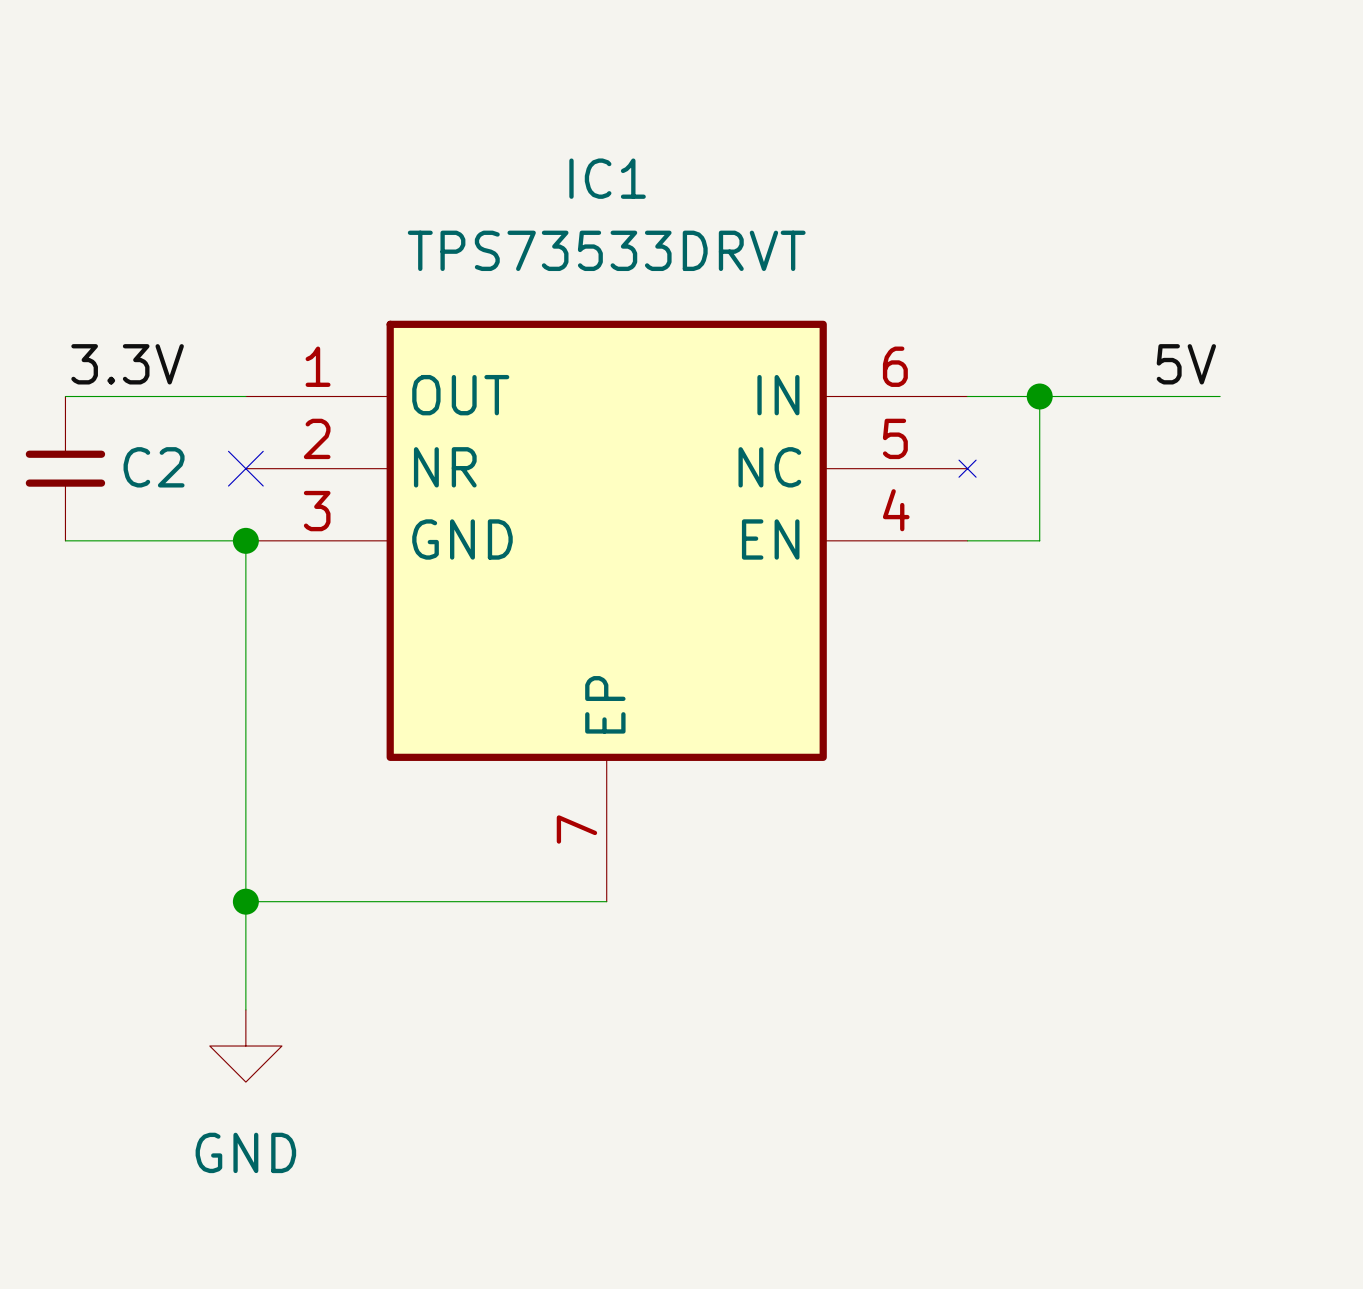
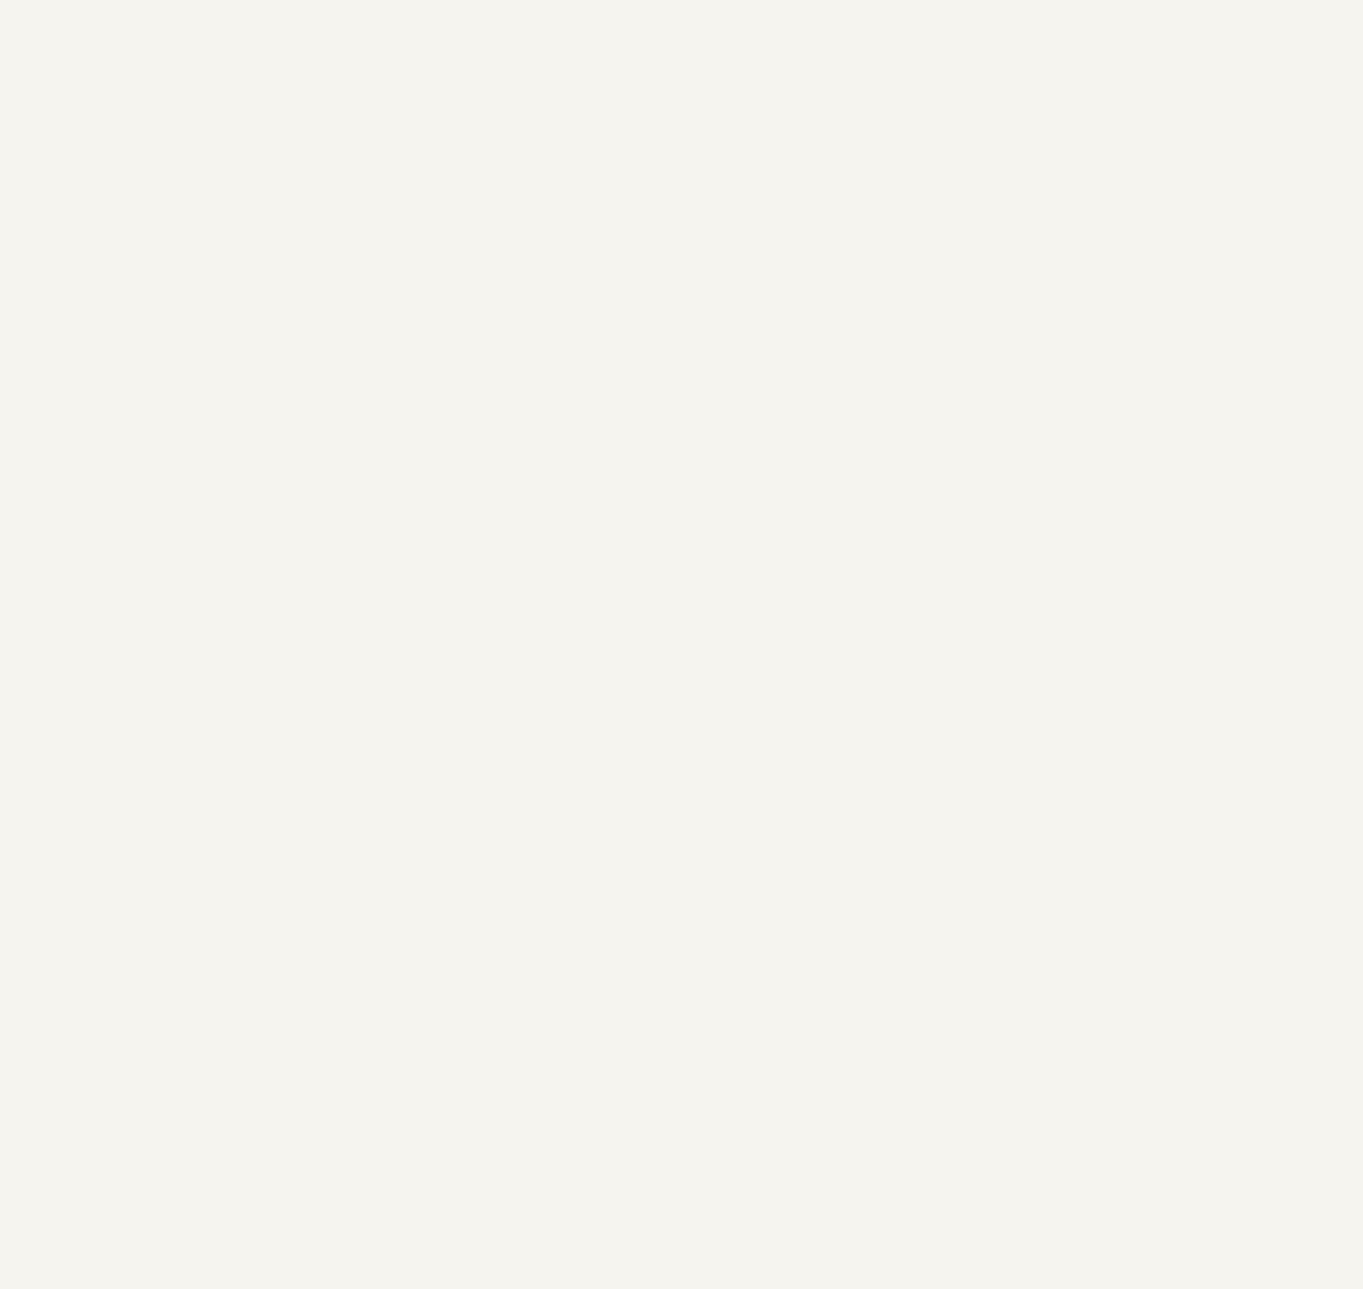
label: 3.3V (127, 364) -> none
label: 5V (1186, 364) -> none
wire: (65, 396) (245, 396) -> none
wire: (967, 396) (1220, 396) -> none
wire: (1039, 396) (1039, 540) (967, 540) -> none
junction: (1039, 396) -> none
C2: (65, 468) -> none
no-connect mark: (245, 468) -> none
wire: (65, 540) (245, 540) (245, 1009) -> none
junction: (245, 540) -> none
IC1: TPS73533DRVT (610, 611) -> none
wire: (245, 901) (606, 901) -> none
junction: (245, 901) -> none
power symbol: GND (245, 1046) -> none

